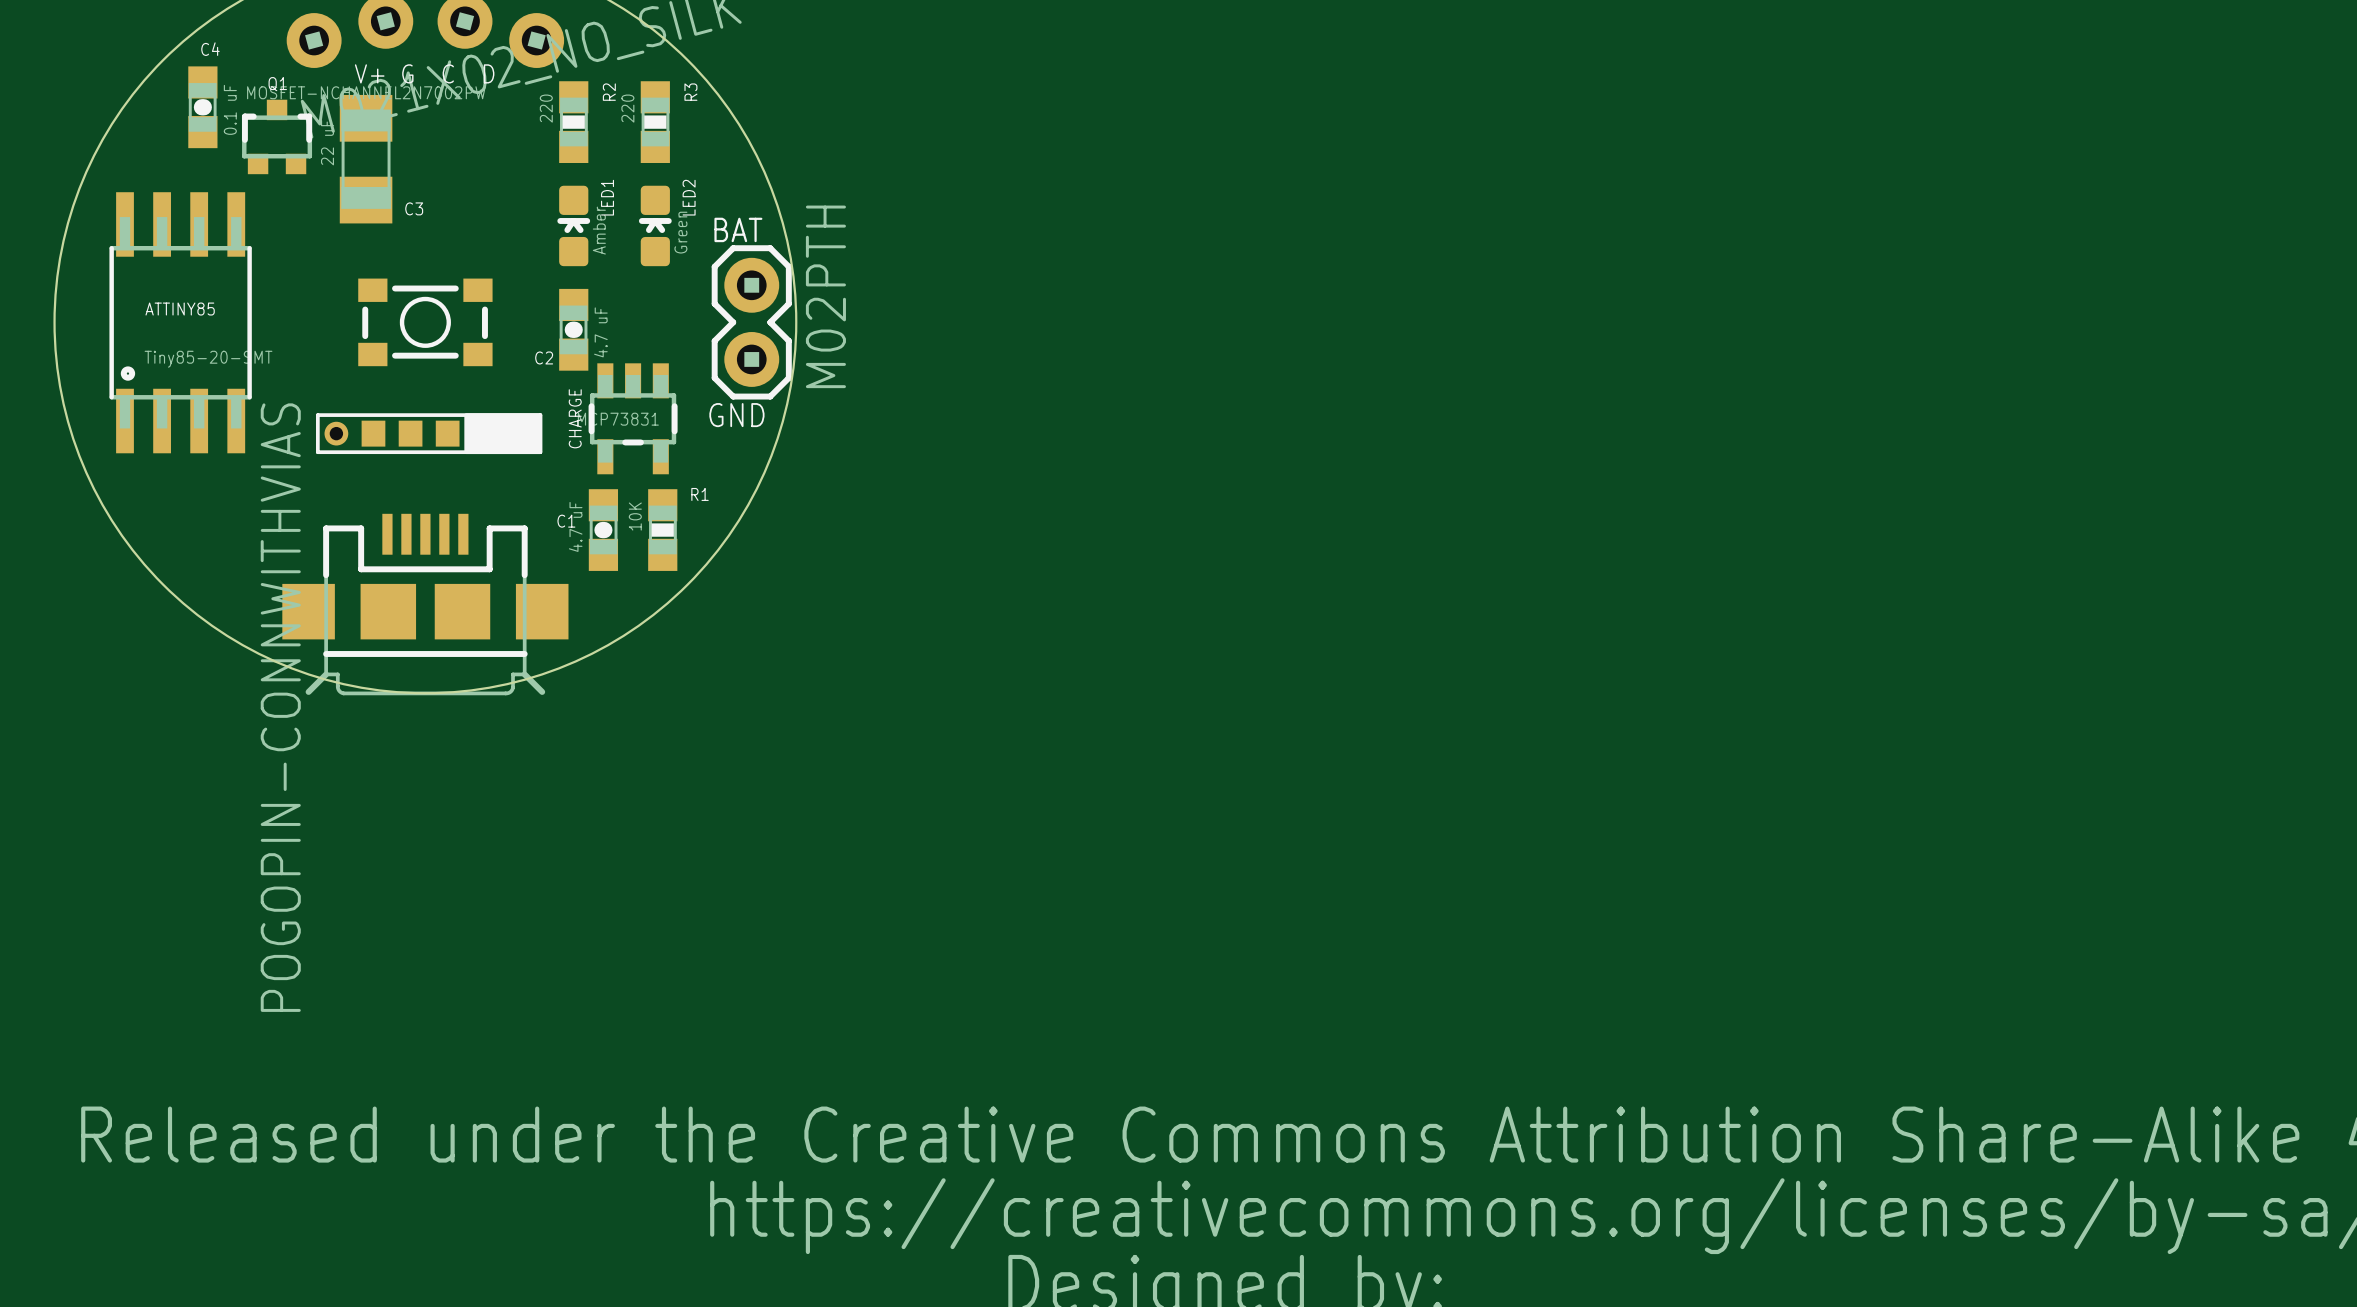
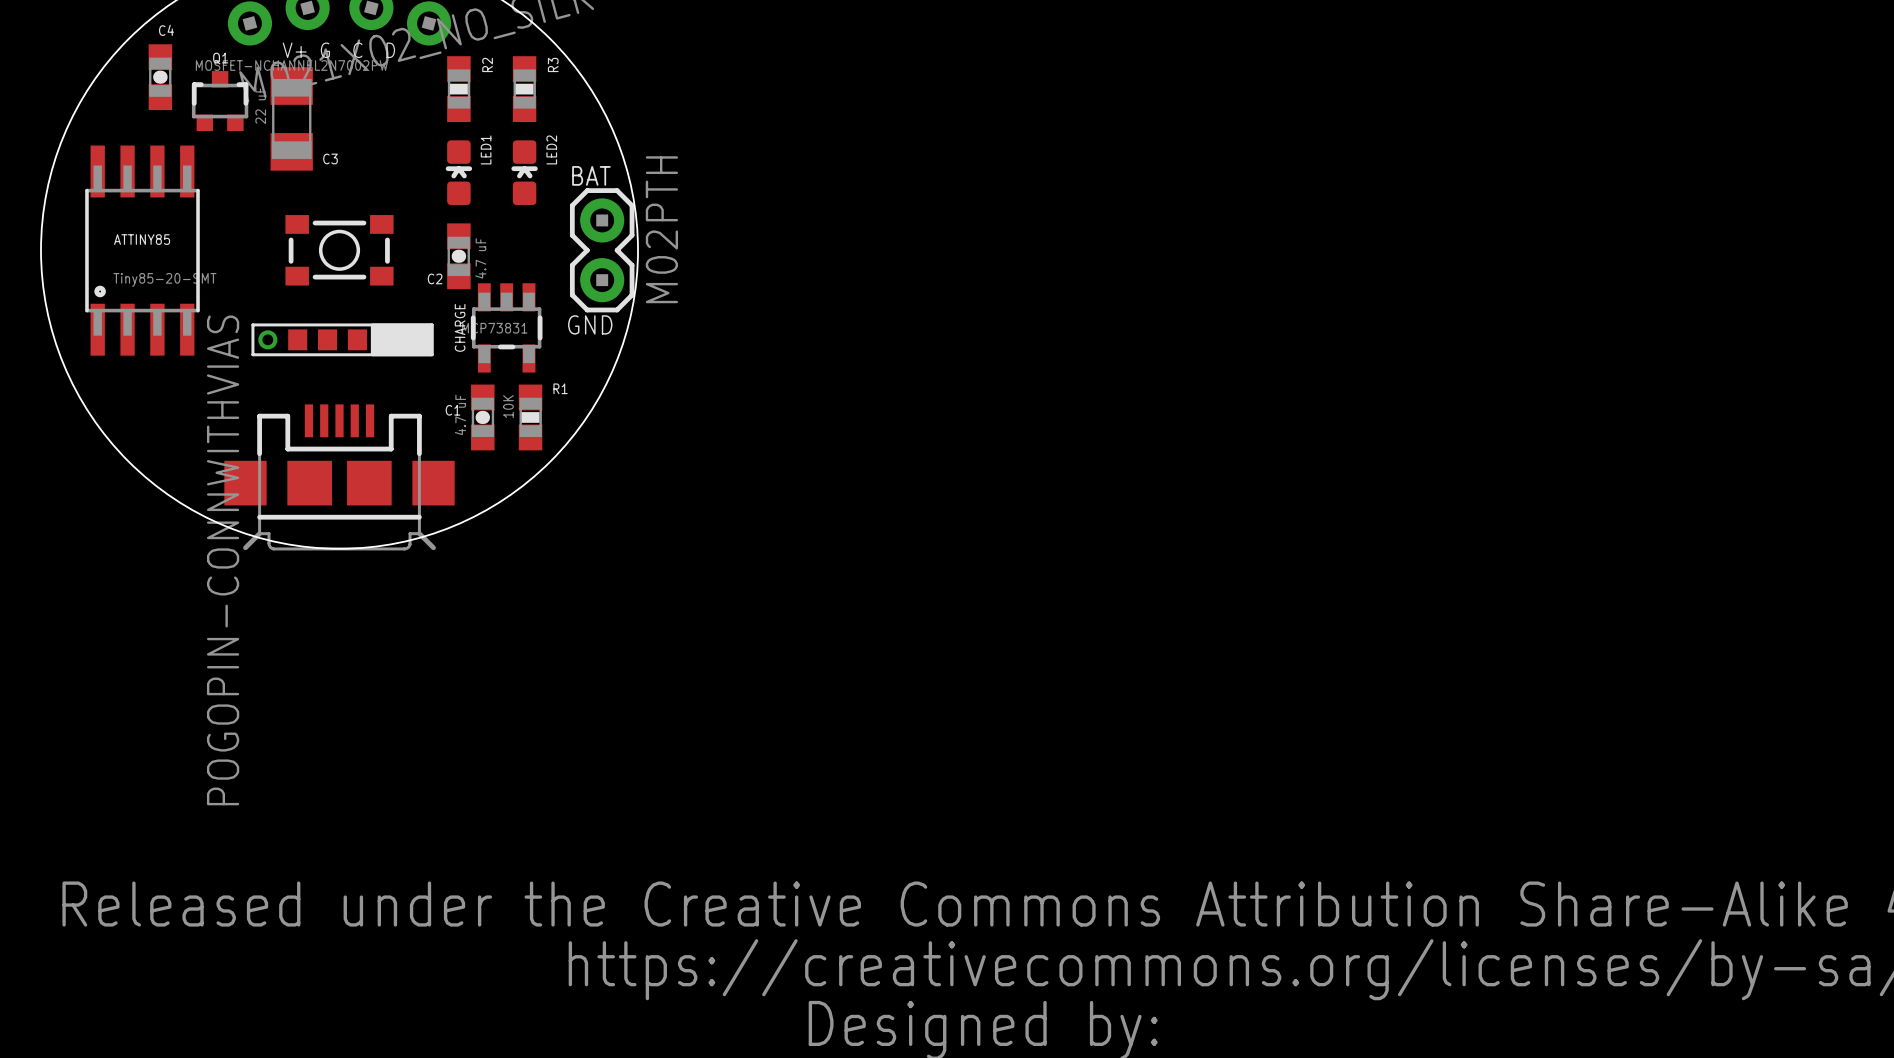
R2 value: 220 (546, 108) -> none
R3 value: 220 (627, 108) -> none
C4 value: 0.1 uF (230, 109) -> none
LED1 value: Amber (599, 230) -> none
LED2 value: Green (680, 232) -> none

